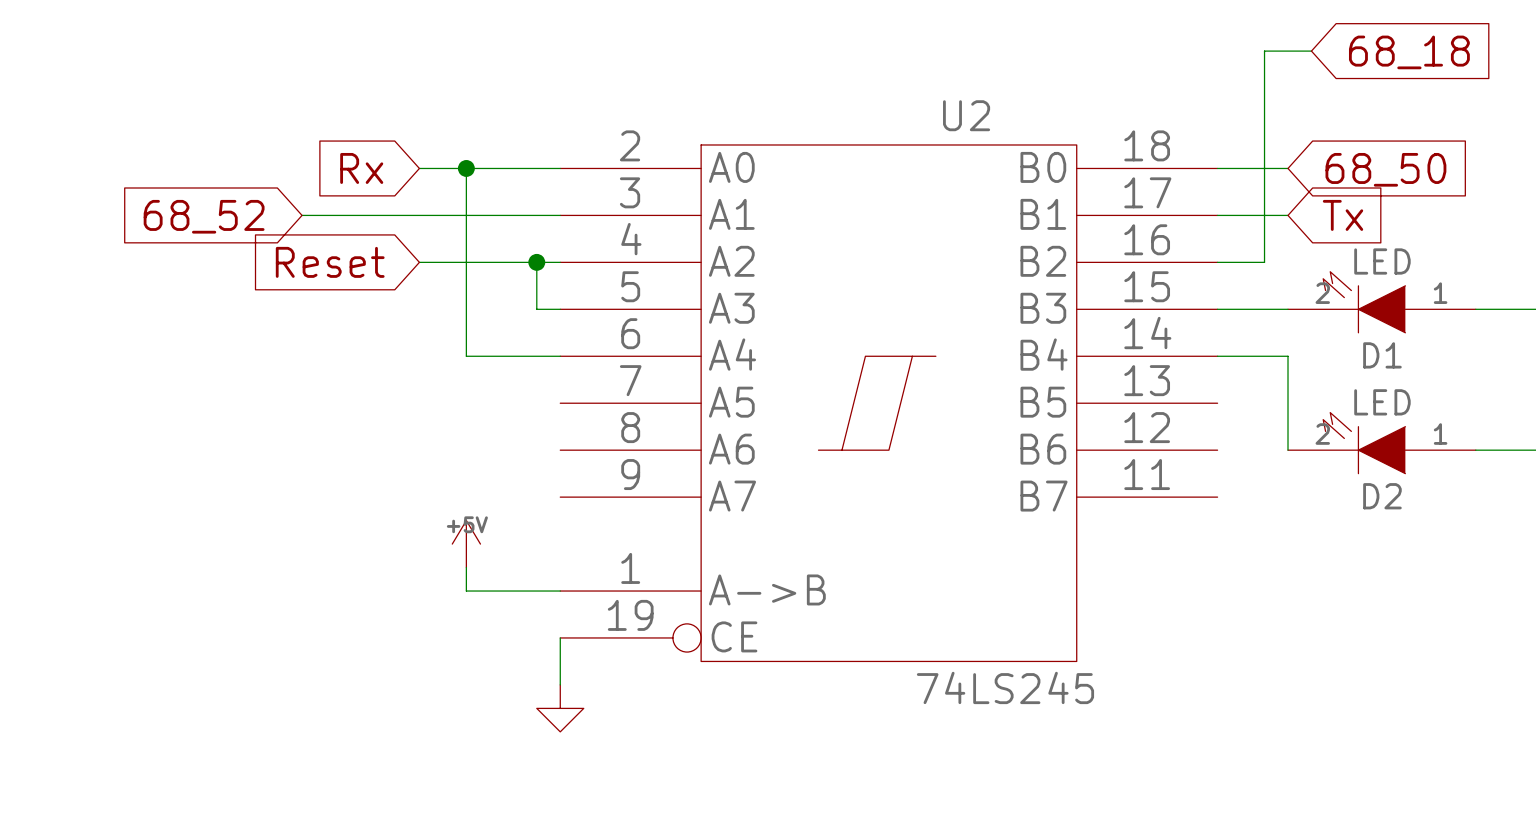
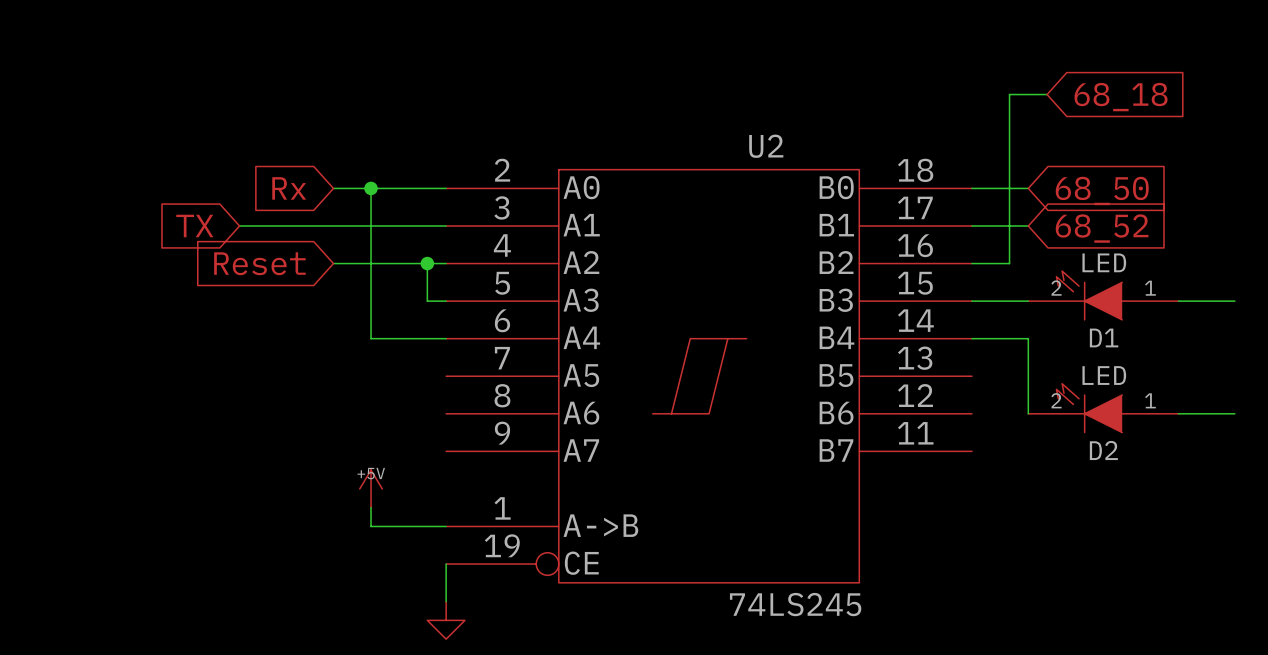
global label: Tx (1343, 215) -> 68_52 (1102, 228)
global label: 68_52 (204, 216) -> TX (194, 226)

